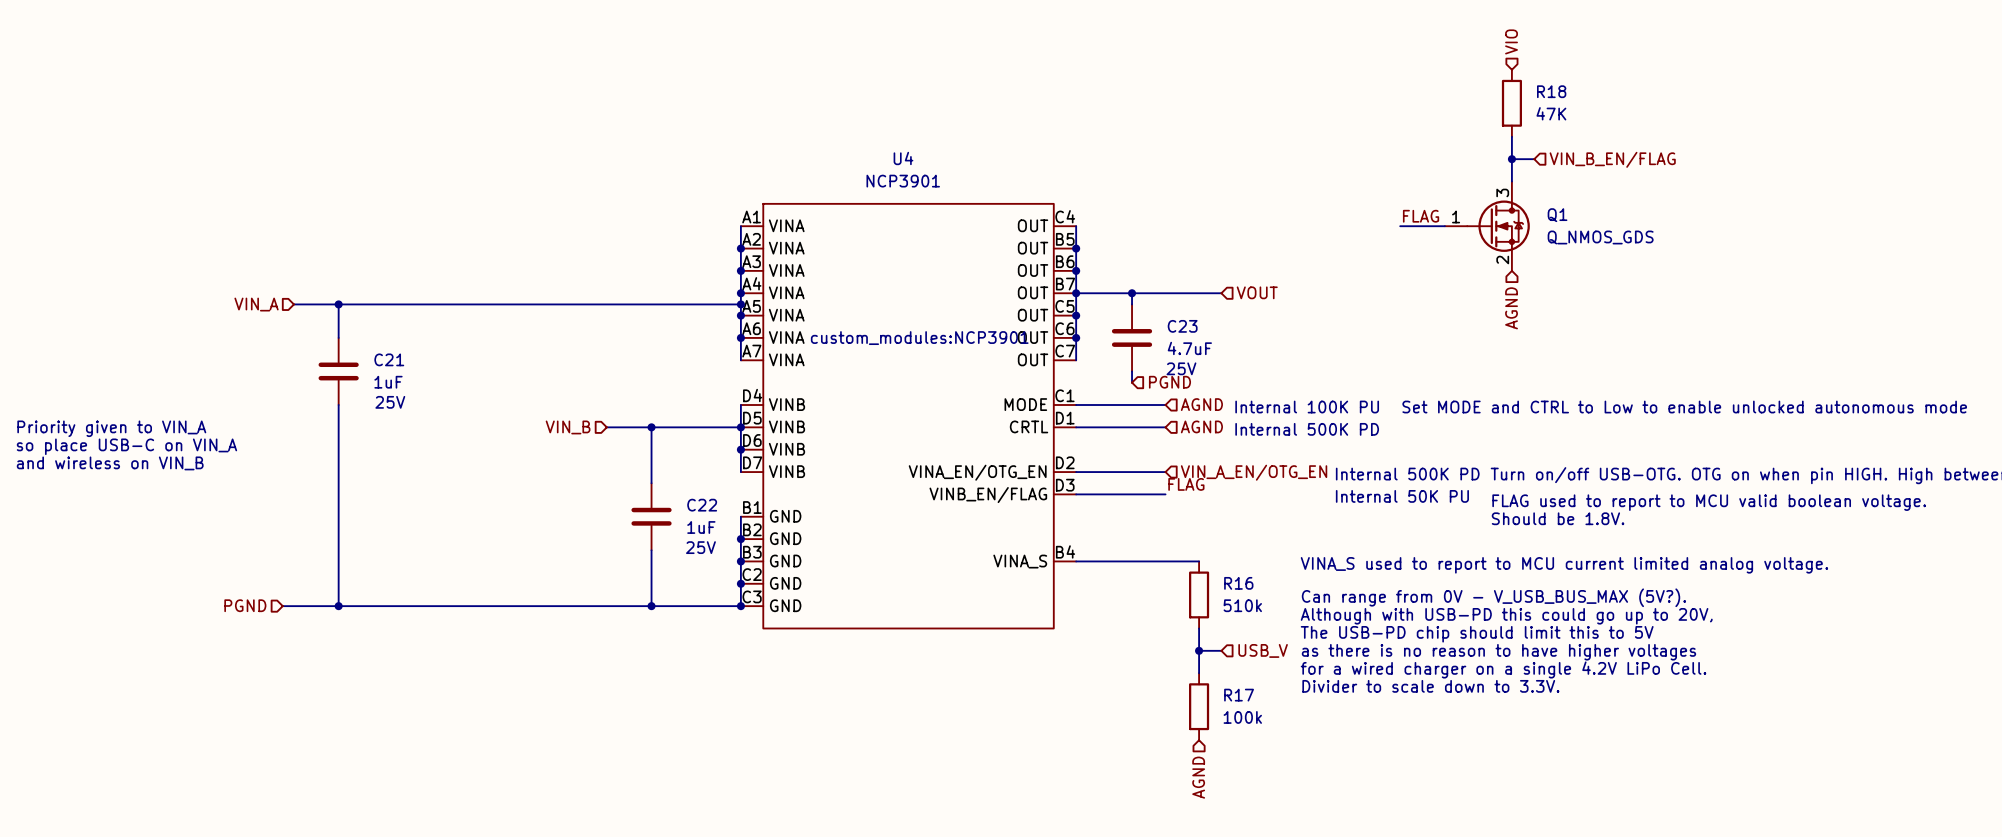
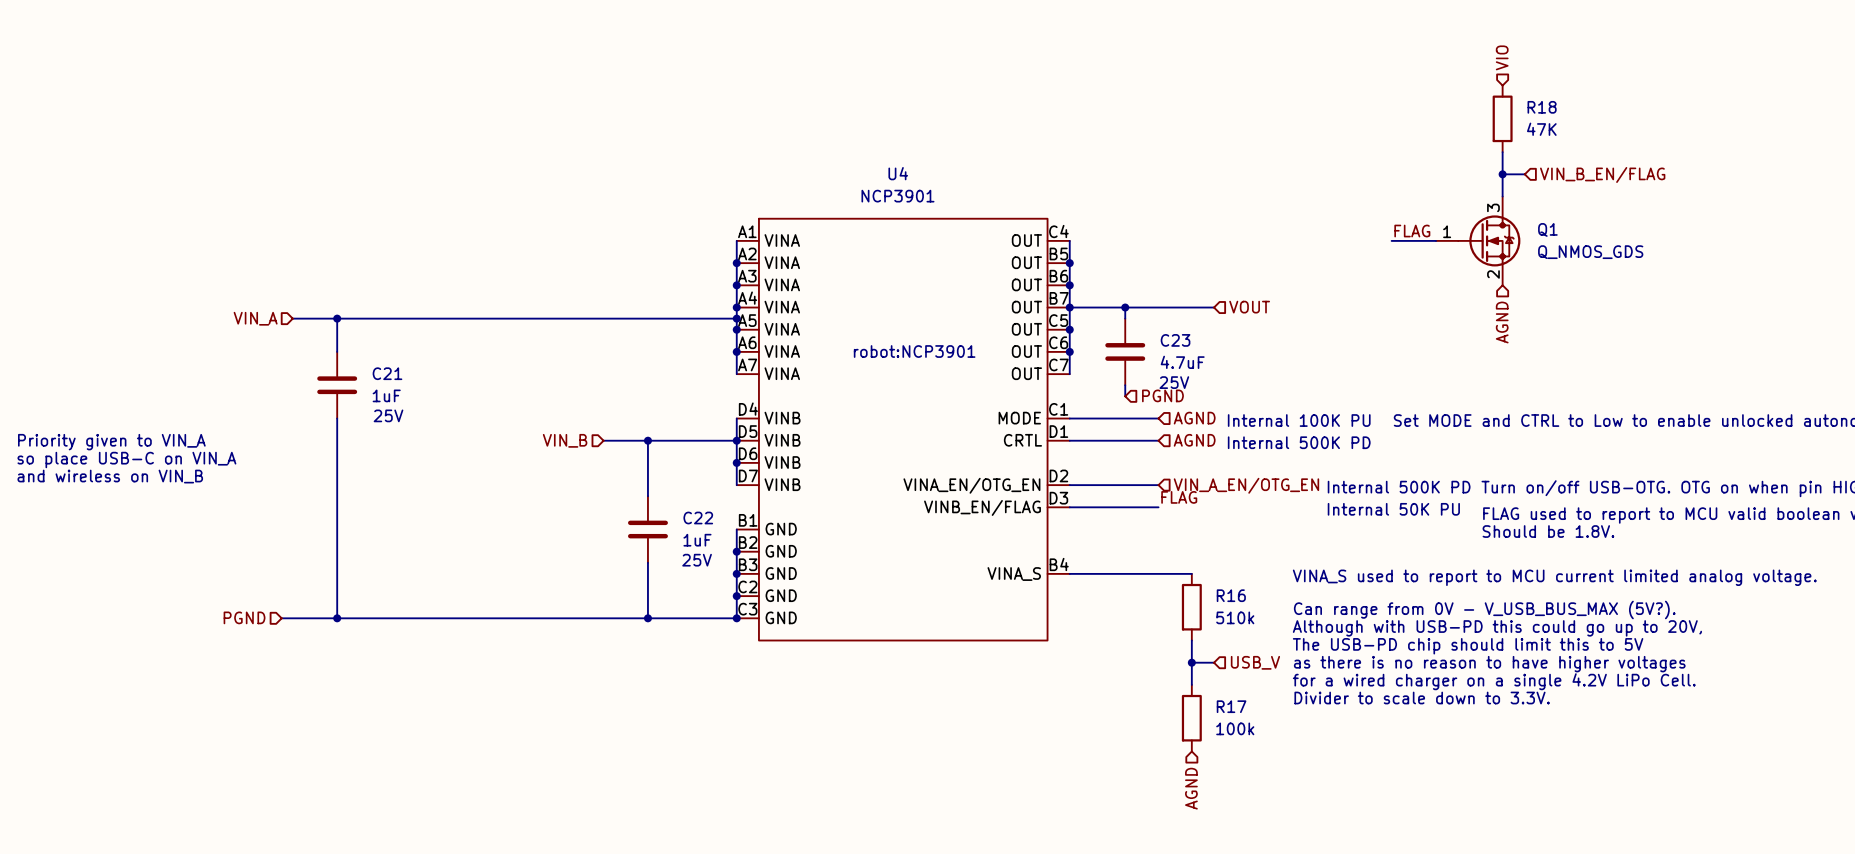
U4 text: custom_modules:NCP3901 (919, 338) -> robot:NCP3901 (914, 351)

